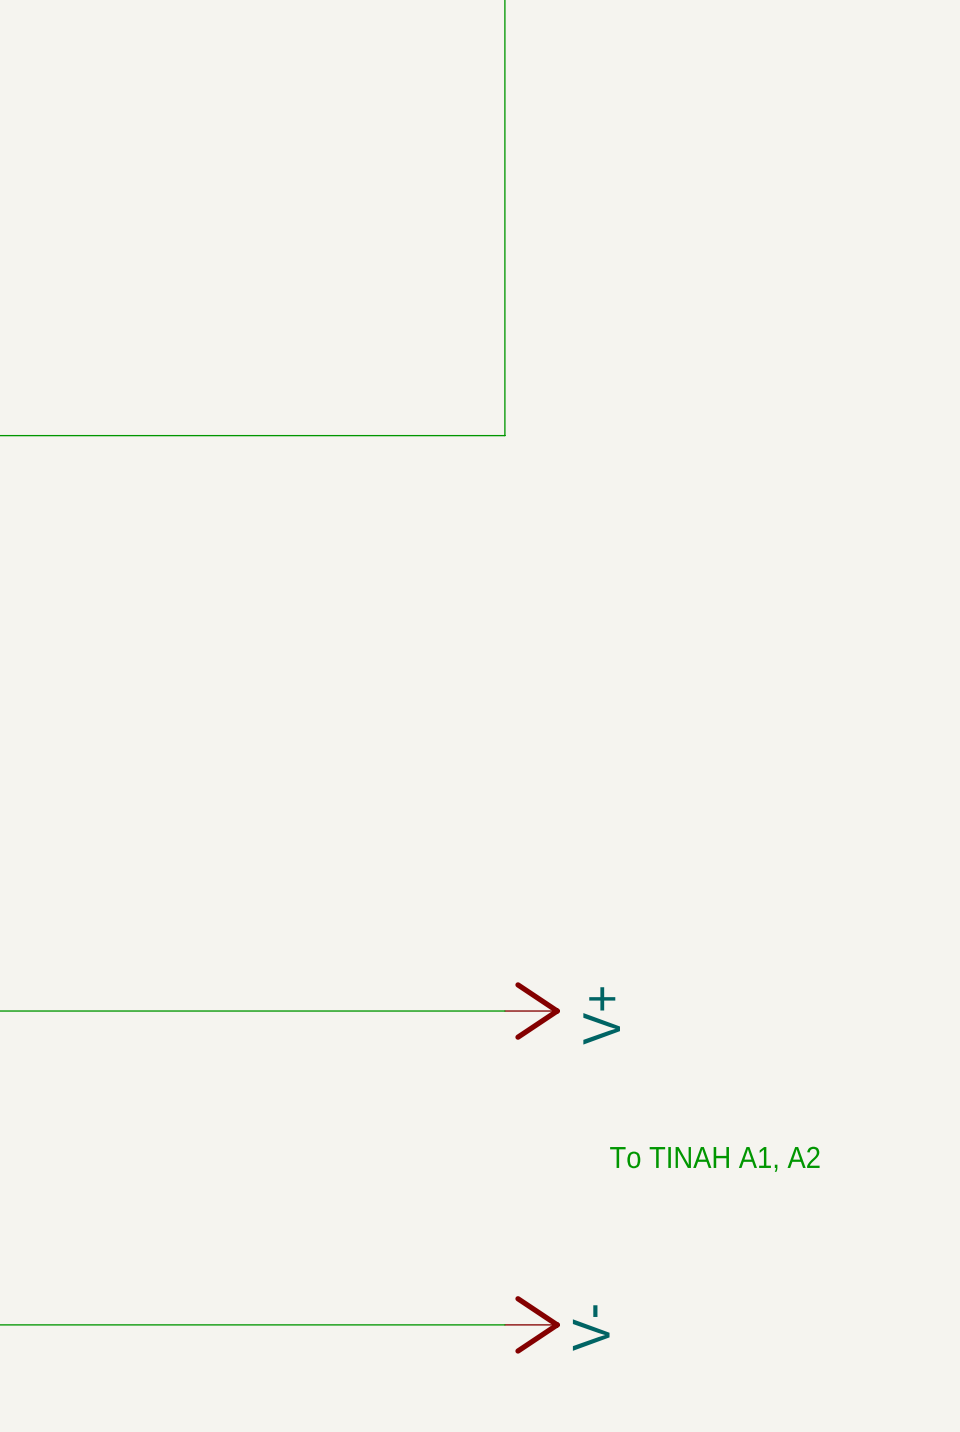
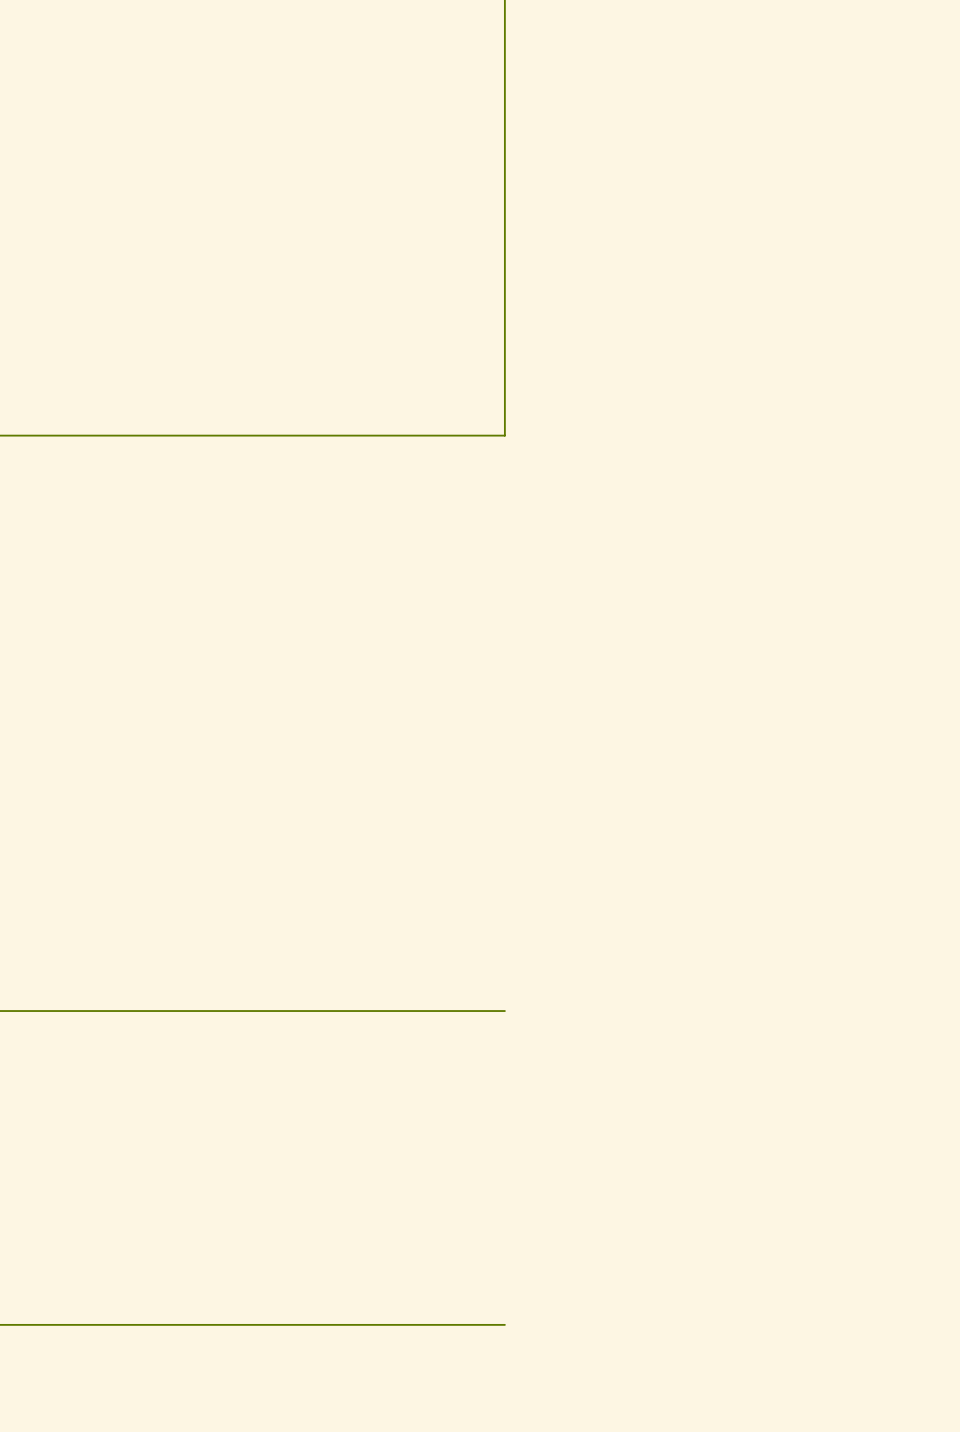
power symbol: V+ (532, 1011) -> none
text: To TINAH A1, A2 (714, 1159) -> none
power symbol: V- (532, 1324) -> none

